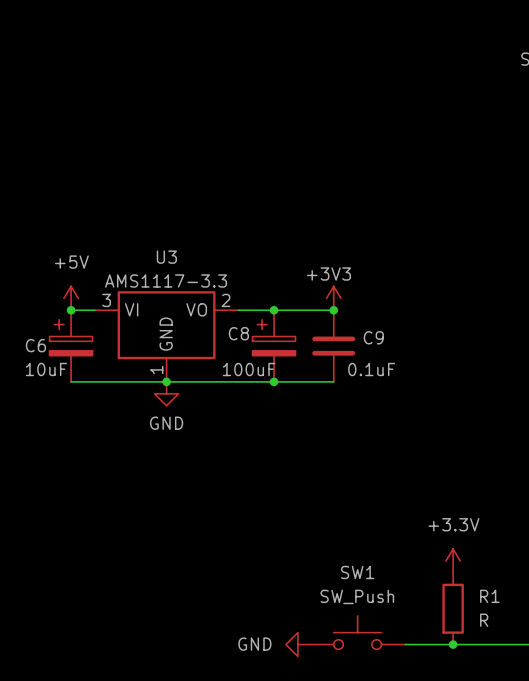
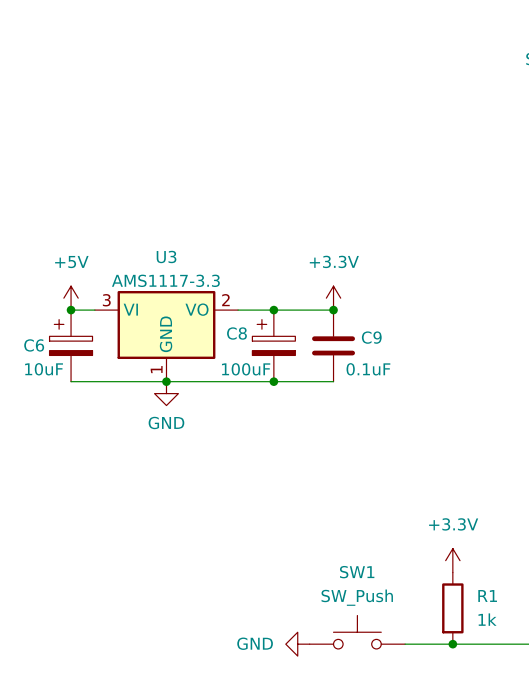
power symbol: +3V3 (333, 298) -> +3.3V (333, 298)
R1 value: R (484, 620) -> 1k (487, 619)

